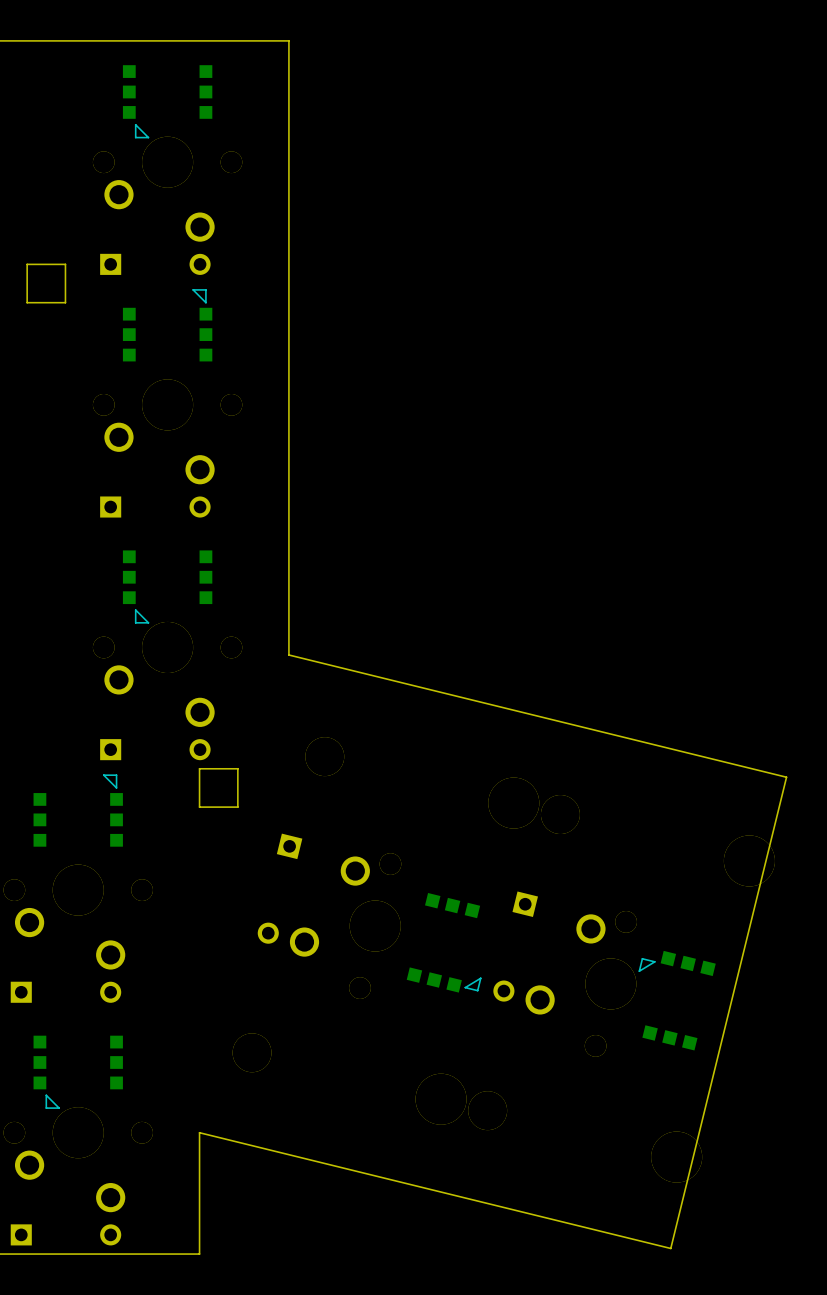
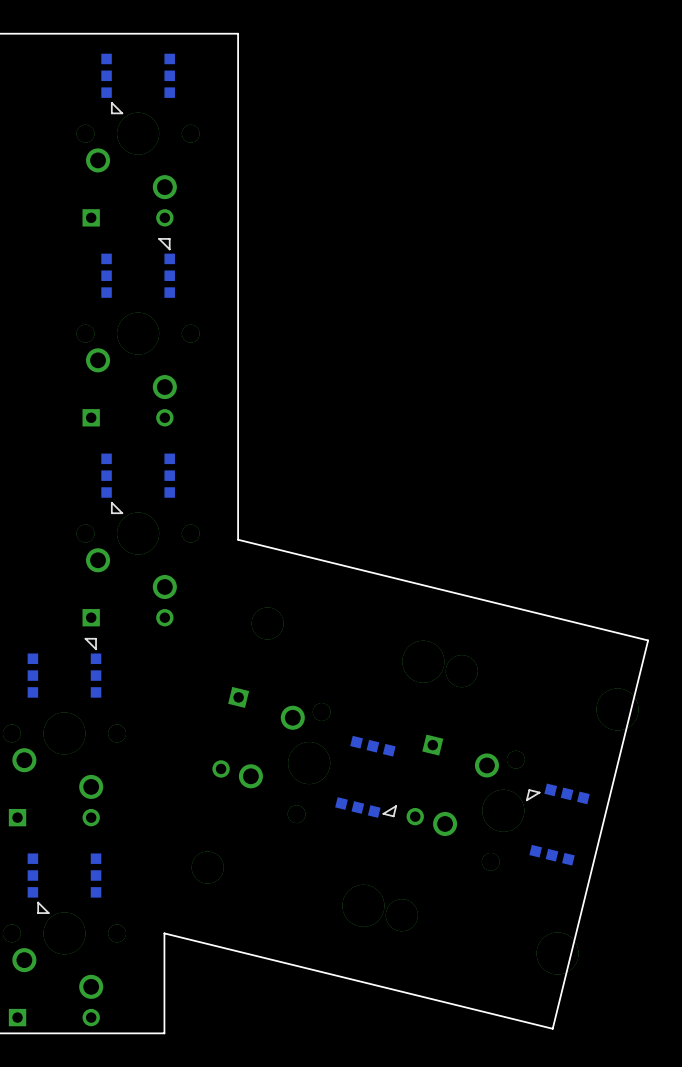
board edge: (65, 264) (27, 264) (27, 302) (65, 302) (65, 264) -> none
board edge: (237, 768) (199, 768) (199, 807) (237, 807) (237, 768) -> none

